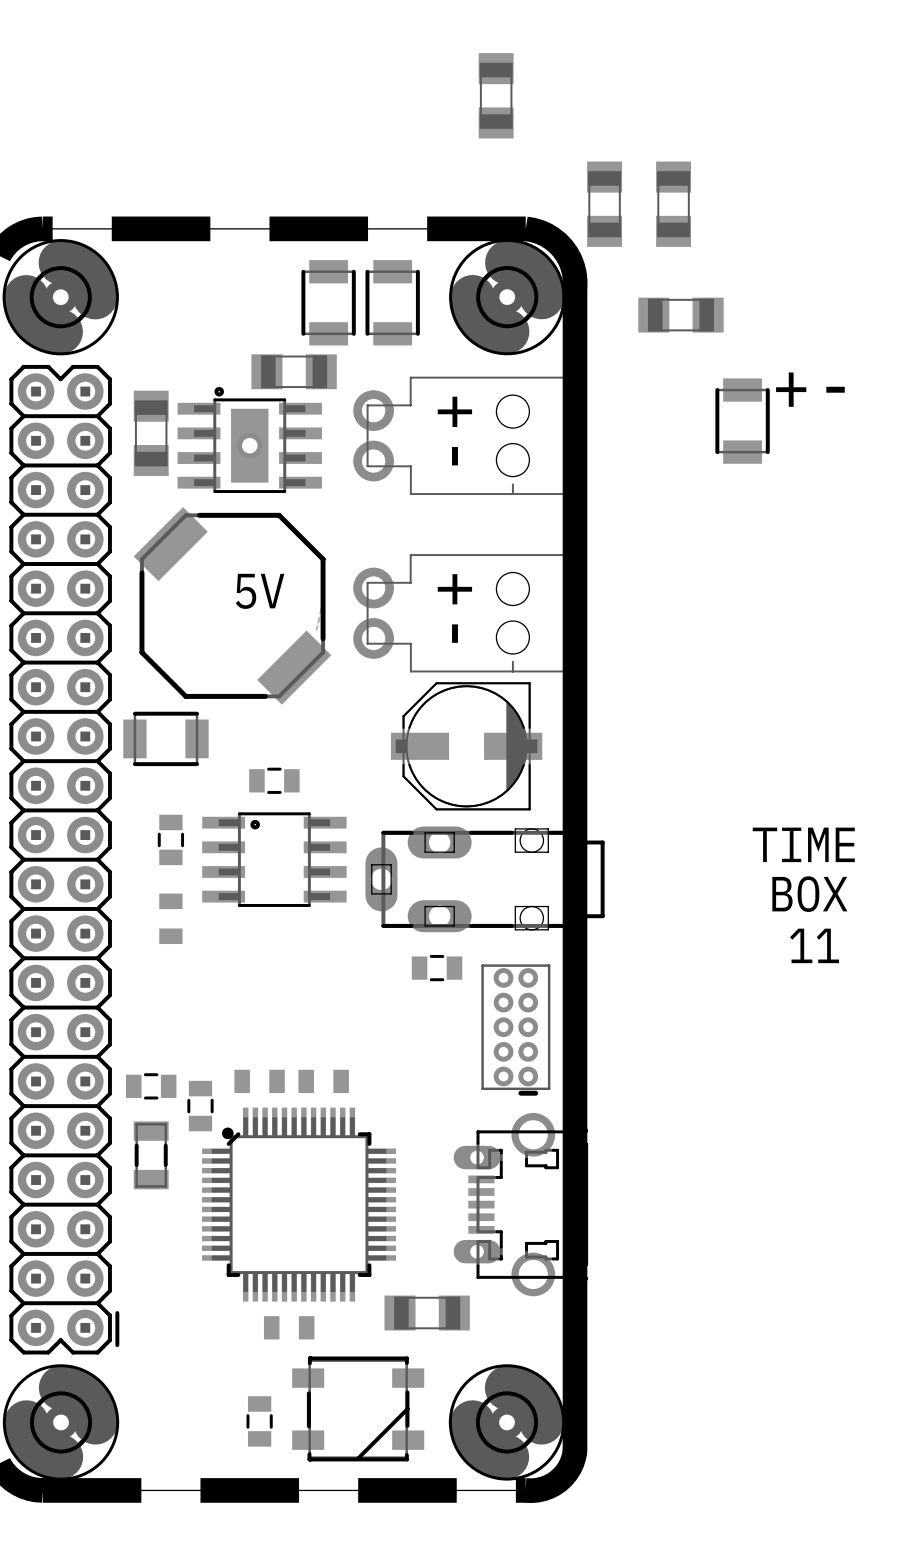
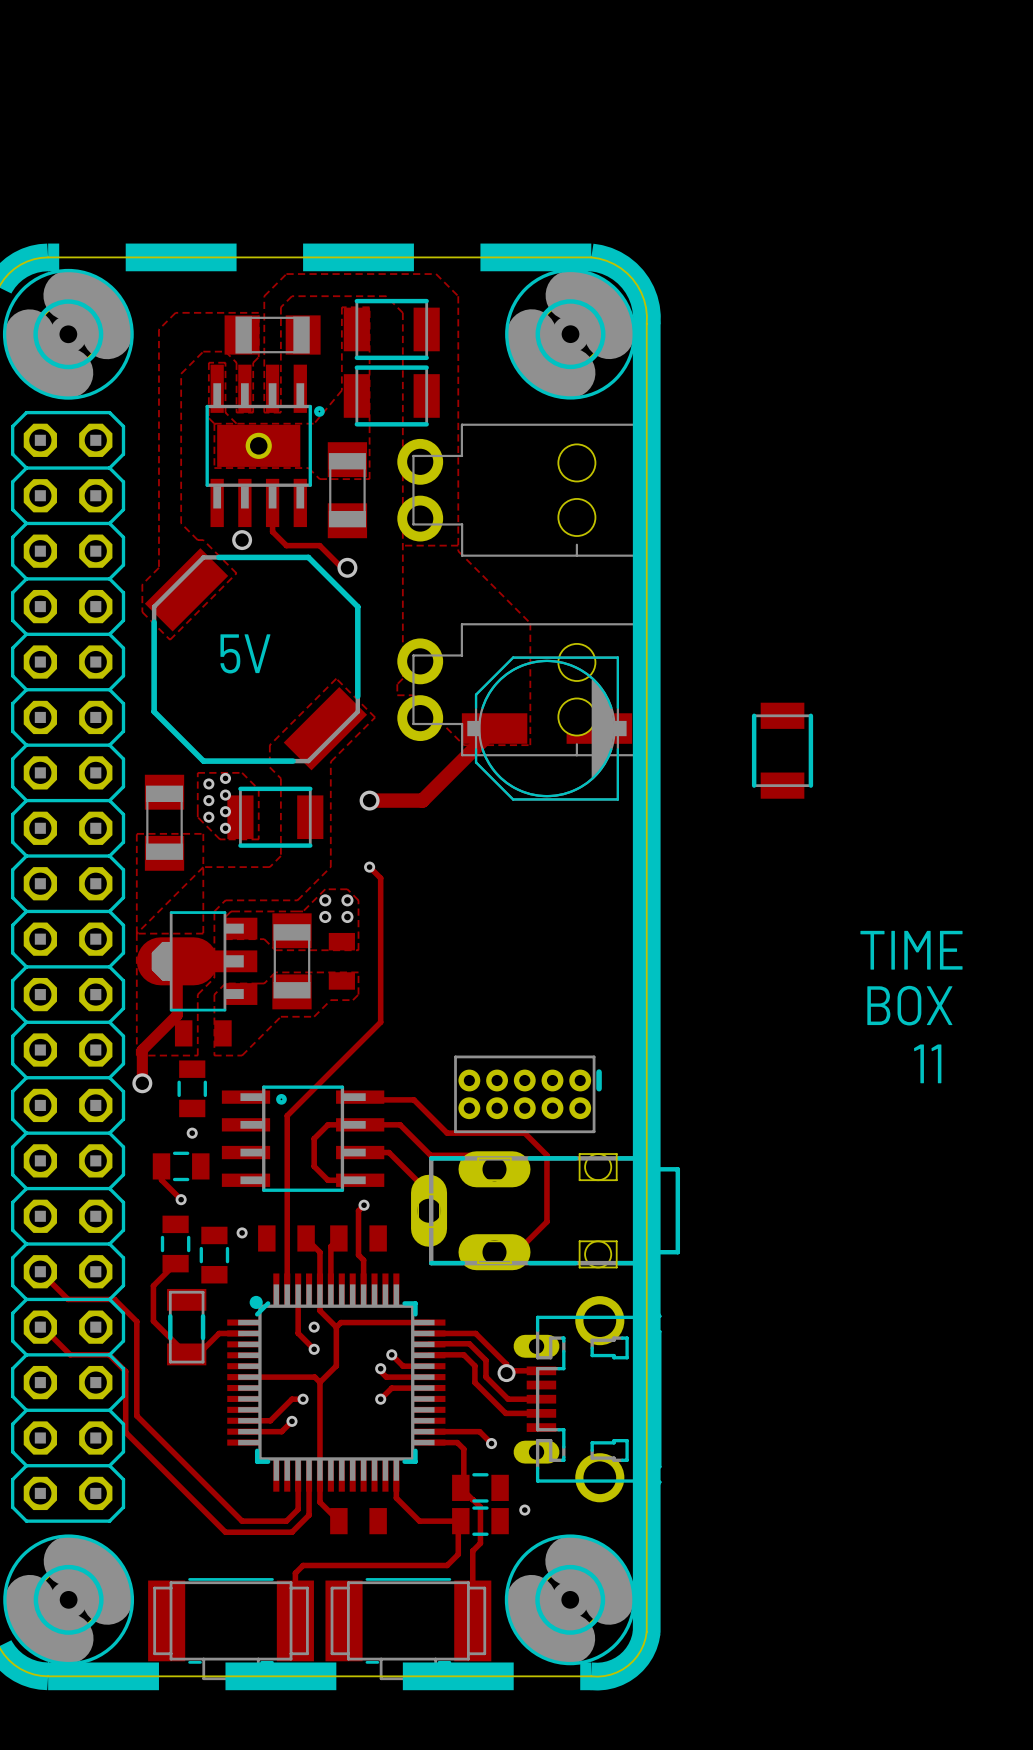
part: (496, 95) -> none
part: (604, 204) -> none
part: (673, 204) -> none
zone outline: none -> (286, 274) (264, 296) (264, 412) (280, 412) (280, 307) (291, 296) (386, 296) (402, 312) (402, 678) (397, 684) (397, 695) (413, 695) (463, 745) (530, 745) (530, 623) (458, 551) (458, 296) (436, 274) (286, 274)
zone outline: none -> (175, 312) (258, 312) (258, 357) (253, 362) (253, 412) (236, 412) (236, 362) (225, 351) (203, 351) (181, 373) (181, 523) (197, 540) (203, 540) (236, 573) (170, 639) (142, 612) (142, 584) (158, 567) (158, 329) (175, 312)
part: none -> (272, 335)
part rotation: 0° (328, 302) -> 90° clockwise (391, 329)
part: (392, 302) -> none
part: (680, 315) -> none
part: none -> (391, 395)
part footprint: [9, 364, 120, 1355] -> [10, 410, 126, 1523]
part: (294, 371) -> none
zone outline: none -> (214, 423) (214, 468) (308, 468) (319, 479) (369, 479) (369, 307) (341, 307) (341, 390) (314, 423) (214, 423)
zone outline: none -> (214, 423) (208, 418) (208, 362) (225, 362) (225, 412) (236, 423)
text: + (791, 389) -> none
text: - (835, 389) -> none
part: none -> (265, 445)
text: + (454, 411) -> none
part: (742, 421) -> none
part: (151, 433) -> none
part: none -> (347, 490)
part: (249, 439) -> none
track: none -> (272, 502) (272, 531) (286, 545) (319, 545) (341, 567) (347, 567)
text: - (454, 456) -> none
via: none -> (242, 540)
zone outline: none -> (402, 545) (458, 545)
via: none -> (347, 567)
text: + (454, 589) -> none
text position: 5V (260, 591) -> 5V (245, 653)
zone outline: none -> (336, 678) (375, 717) (330, 761) (330, 867) (297, 900) (225, 900) (214, 911) (214, 977) (197, 994) (197, 1055) (136, 1055) (136, 833) (203, 833) (203, 933) (136, 933) (203, 867) (269, 867) (280, 856) (280, 778) (269, 767) (269, 745) (336, 678)
part position: (232, 605) -> (255, 659)
zone outline: (321, 608) (316, 630) (318, 623) (321, 608) -> none
text: - (454, 633) -> none
track: none -> (494, 728) (422, 800) (369, 800)
part: none -> (782, 750)
zone outline: none -> (197, 772) (197, 817) (219, 839) (258, 839) (258, 789) (242, 772) (197, 772)
via: none -> (225, 778)
via: none -> (208, 783)
via: none -> (225, 795)
via: none -> (208, 800)
via: none -> (369, 800)
via: none -> (225, 811)
via: none -> (208, 817)
part: none -> (164, 822)
via: none -> (225, 828)
part position: (165, 738) -> (275, 817)
part position: (466, 746) -> (546, 728)
track: none -> (369, 867) (380, 878) (380, 1022) (287, 1115) (287, 1289)
via: none -> (369, 867)
part: (274, 780) -> none
zone outline: none -> (325, 889) (347, 889) (358, 900) (358, 950) (275, 950) (264, 939) (225, 939) (225, 916) (231, 911) (303, 911) (325, 889)
via: none -> (325, 900)
via: none -> (347, 900)
part footprint: [157, 814, 185, 866] -> [136, 911, 258, 1012]
via: none -> (325, 916)
via: none -> (347, 916)
track: none -> (177, 961) (177, 1015) (142, 1050) (142, 1083)
part: none -> (291, 961)
part: none -> (341, 961)
part position: (274, 859) -> (303, 1138)
zone outline: none -> (275, 972) (358, 972) (358, 994) (352, 1000) (330, 1000) (314, 1016) (280, 1016) (242, 1055) (214, 1055) (214, 994) (225, 983) (264, 983) (275, 972)
part position: (485, 879) -> (545, 1210)
part rotation: 0° (170, 918) -> 90° clockwise (203, 1033)
via: none -> (142, 1083)
part: none -> (192, 1088)
part: (437, 968) -> none
part: none -> (527, 1094)
track: none -> (360, 1097) (362, 1099) (413, 1099) (447, 1133) (524, 1133) (546, 1155) (546, 1221) (516, 1252) (494, 1252)
via: none -> (192, 1133)
track: none -> (360, 1152) (388, 1152) (429, 1192) (429, 1210)
part: (515, 1030) -> none
track: none -> (161, 1166) (161, 1180) (181, 1199)
part: none -> (181, 1166)
track: none -> (494, 1169) (480, 1155) (430, 1155) (400, 1124) (328, 1124) (314, 1138) (314, 1166) (328, 1180) (360, 1180)
via: none -> (181, 1199)
track: none -> (364, 1205) (358, 1210) (358, 1255) (363, 1260) (363, 1289)
via: none -> (364, 1205)
part position: (259, 1081) -> (286, 1238)
part position: (323, 1081) -> (358, 1238)
part rotation: 0° (151, 1086) -> 90° clockwise (175, 1244)
via: none -> (242, 1232)
track: none -> (306, 1238) (319, 1252) (319, 1310) (336, 1327)
track: none -> (338, 1238) (330, 1246) (330, 1289)
part position: (200, 1106) -> (214, 1255)
track: none -> (175, 1263) (153, 1285) (153, 1321) (186, 1354) (198, 1354) (219, 1333) (243, 1333)
track: none -> (40, 1271) (68, 1299) (114, 1299) (136, 1321) (136, 1415) (242, 1521) (286, 1521) (298, 1509) (298, 1475)
track: none -> (298, 1289) (298, 1333) (314, 1349)
part position: (151, 1155) -> (186, 1327)
track: none -> (429, 1322) (340, 1322) (336, 1327)
track: none -> (40, 1327) (42, 1327) (70, 1354) (109, 1354) (125, 1371) (125, 1432) (225, 1532) (291, 1532) (309, 1515) (309, 1475)
via: none -> (314, 1327)
track: none -> (336, 1327) (336, 1365) (319, 1382)
track: none -> (429, 1333) (475, 1333) (506, 1364) (506, 1373) (508, 1370) (541, 1370)
track: none -> (429, 1344) (469, 1343) (485, 1360) (485, 1377) (508, 1399) (541, 1399)
via: none -> (314, 1349)
part position: (299, 1204) -> (336, 1382)
track: none -> (391, 1354) (403, 1366) (429, 1366)
via: none -> (391, 1354)
part: (520, 1204) -> none
track: none -> (429, 1355) (463, 1354) (474, 1365) (474, 1382) (505, 1413) (541, 1413)
track: none -> (380, 1368) (380, 1371) (386, 1377) (429, 1377)
via: none -> (380, 1368)
via: none -> (506, 1373)
track: none -> (243, 1377) (314, 1377) (319, 1382)
track: none -> (319, 1382) (319, 1502) (338, 1521) (338, 1529)
track: none -> (428, 1388) (391, 1388) (380, 1399)
track: none -> (303, 1399) (291, 1399) (270, 1420) (243, 1420)
via: none -> (303, 1399)
via: none -> (380, 1399)
part: none -> (587, 1399)
track: none -> (291, 1421) (281, 1431) (243, 1431)
via: none -> (291, 1421)
track: none -> (429, 1431) (479, 1431) (491, 1443)
track: none -> (429, 1442) (457, 1442) (463, 1449) (463, 1484) (460, 1487) (472, 1499)
via: none -> (491, 1443)
part footprint: [384, 1295, 470, 1331] -> [452, 1473, 509, 1503]
track: none -> (396, 1475) (396, 1498) (419, 1521) (460, 1521)
part position: (289, 1327) -> (358, 1521)
track: none -> (472, 1499) (480, 1507) (480, 1543) (472, 1550) (472, 1620) (460, 1608)
via: none -> (524, 1510)
track: none -> (458, 1521) (458, 1554) (447, 1565) (303, 1565) (295, 1573) (295, 1620)
part: none -> (480, 1521)
part: (358, 1408) -> none
part: (259, 1421) -> none
part: none -> (231, 1629)
part: none -> (408, 1629)

